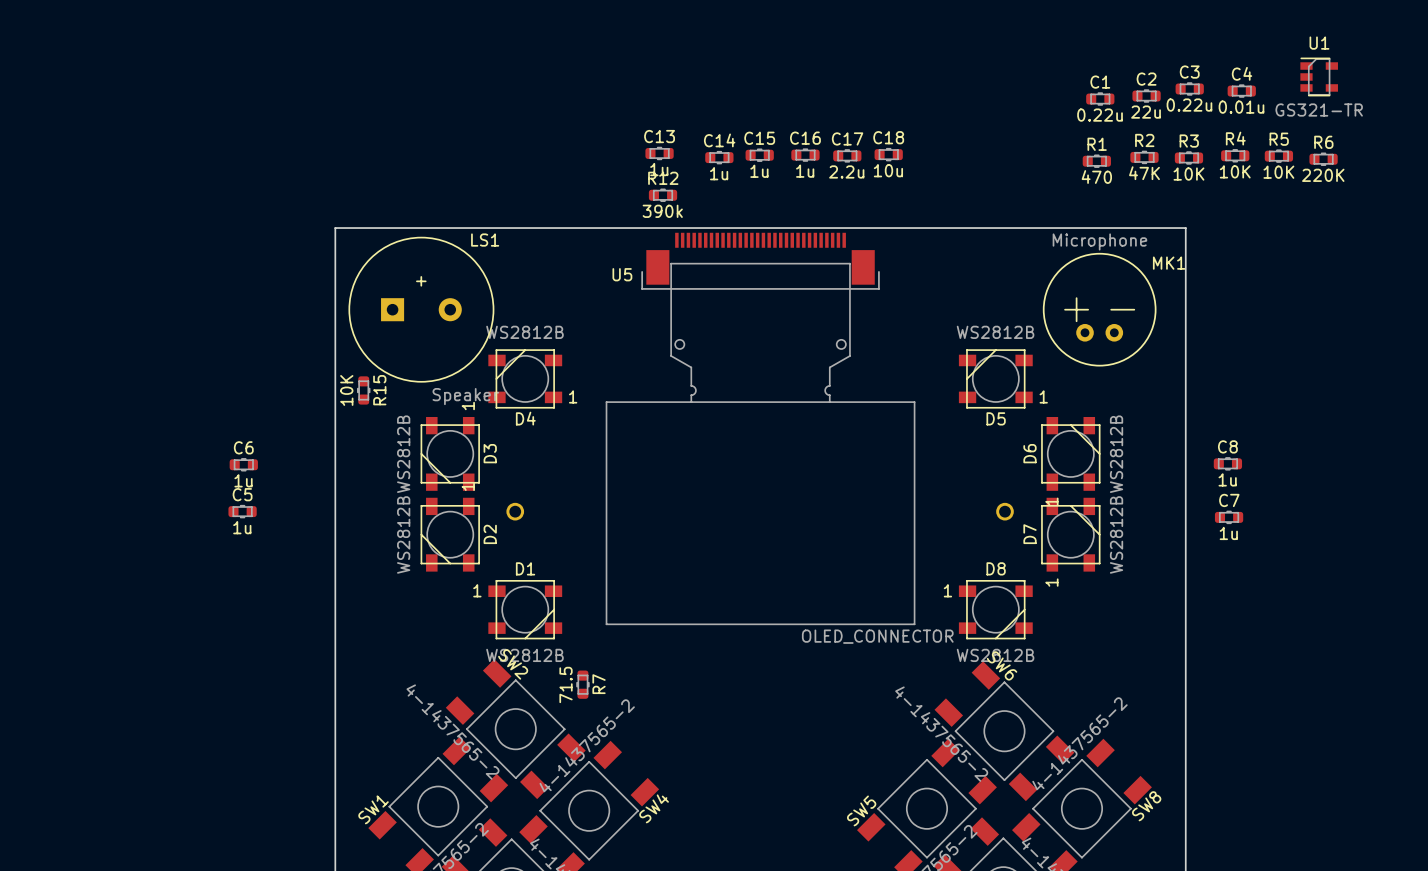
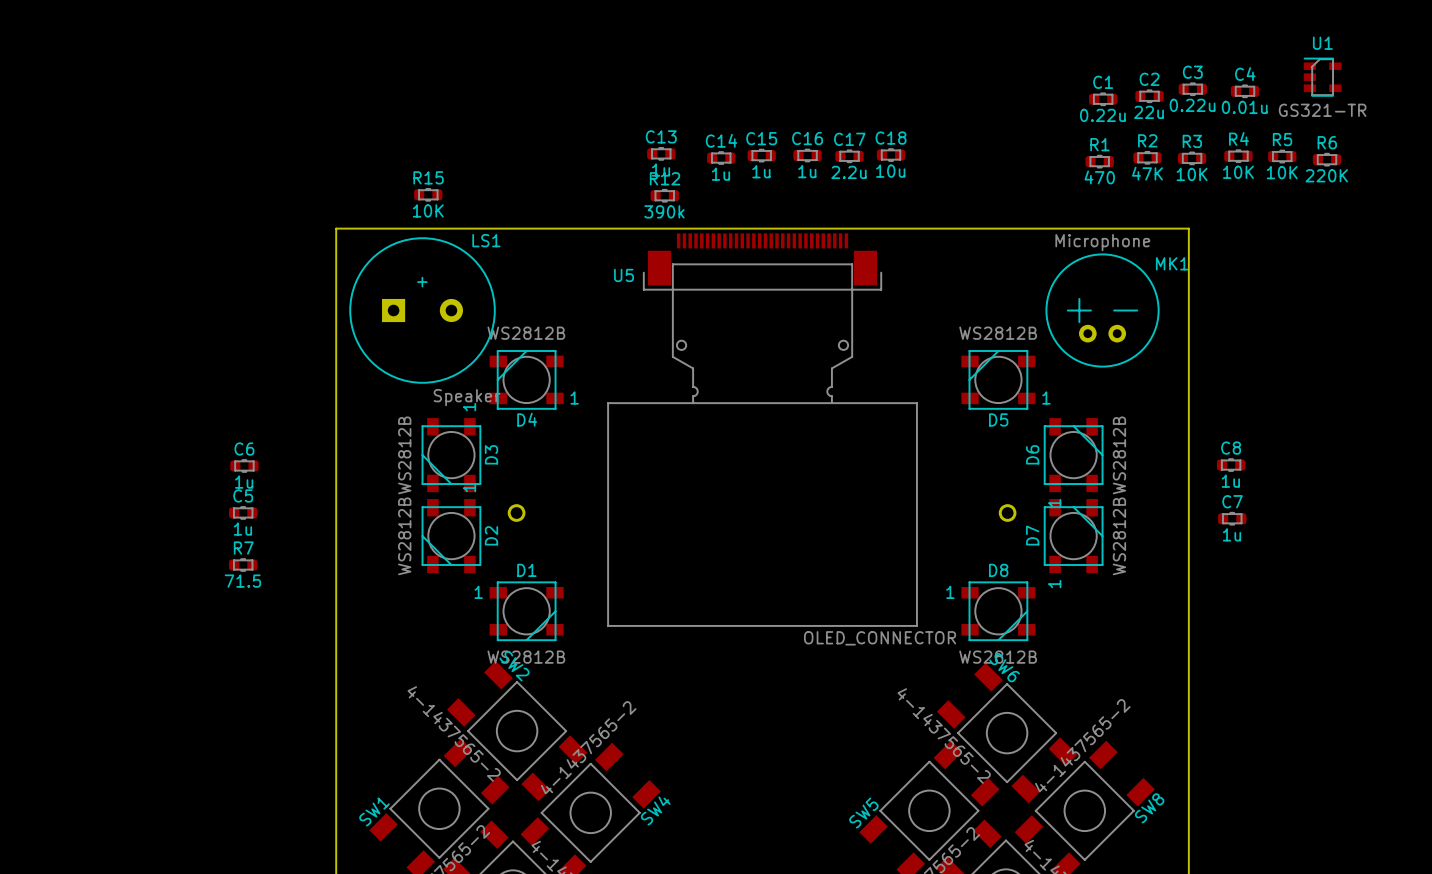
R15 value position: 10K (346, 390) -> 10K (428, 210)
R15 rotation: 0° (363, 390) -> 90° clockwise (428, 194)
R15 position: (363, 390) -> (428, 194)
R15 name position: R15 (379, 390) -> R15 (428, 177)
R7 value position: 71.5 (566, 684) -> 71.5 (242, 581)
R7 rotation: 0° (582, 684) -> 90° clockwise (243, 565)
R7 position: (582, 684) -> (243, 565)
R7 name position: R7 (599, 684) -> R7 (243, 548)

